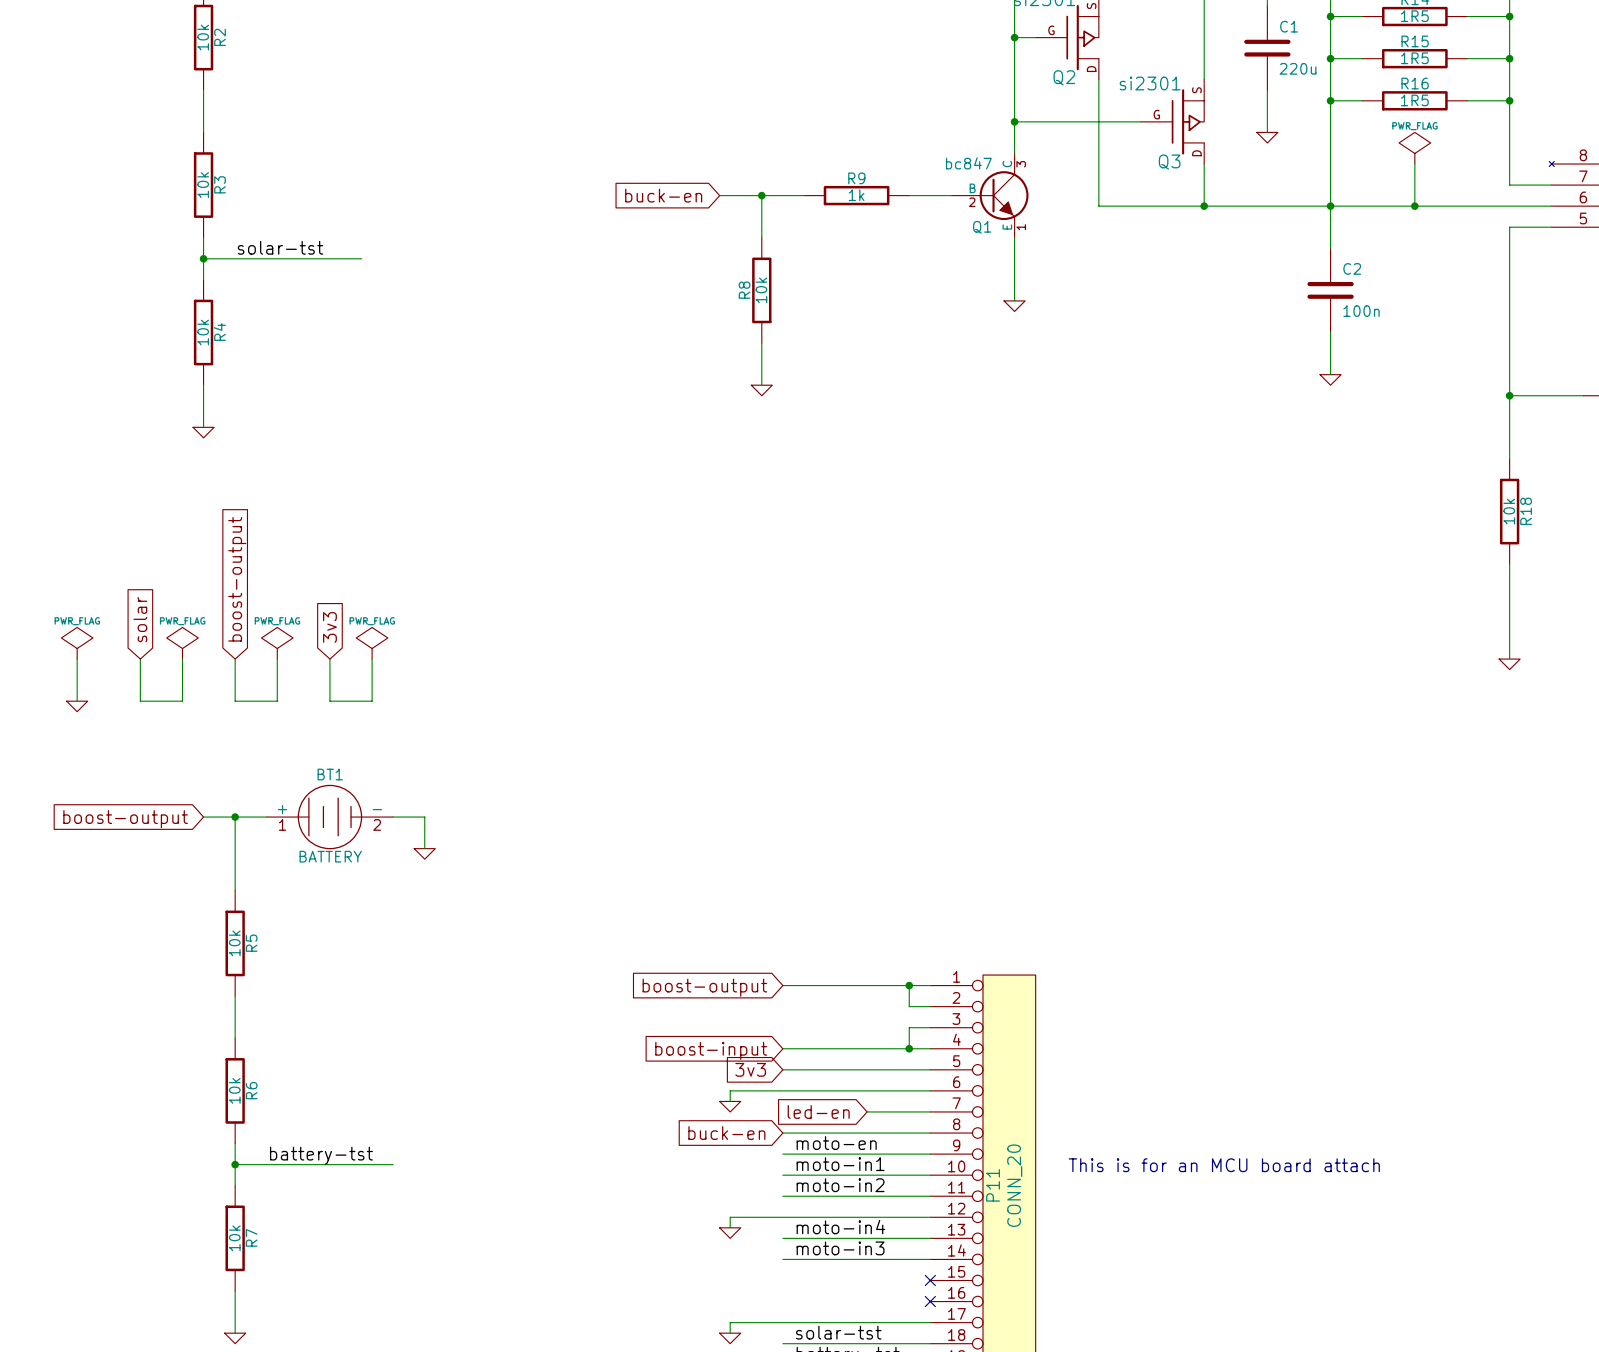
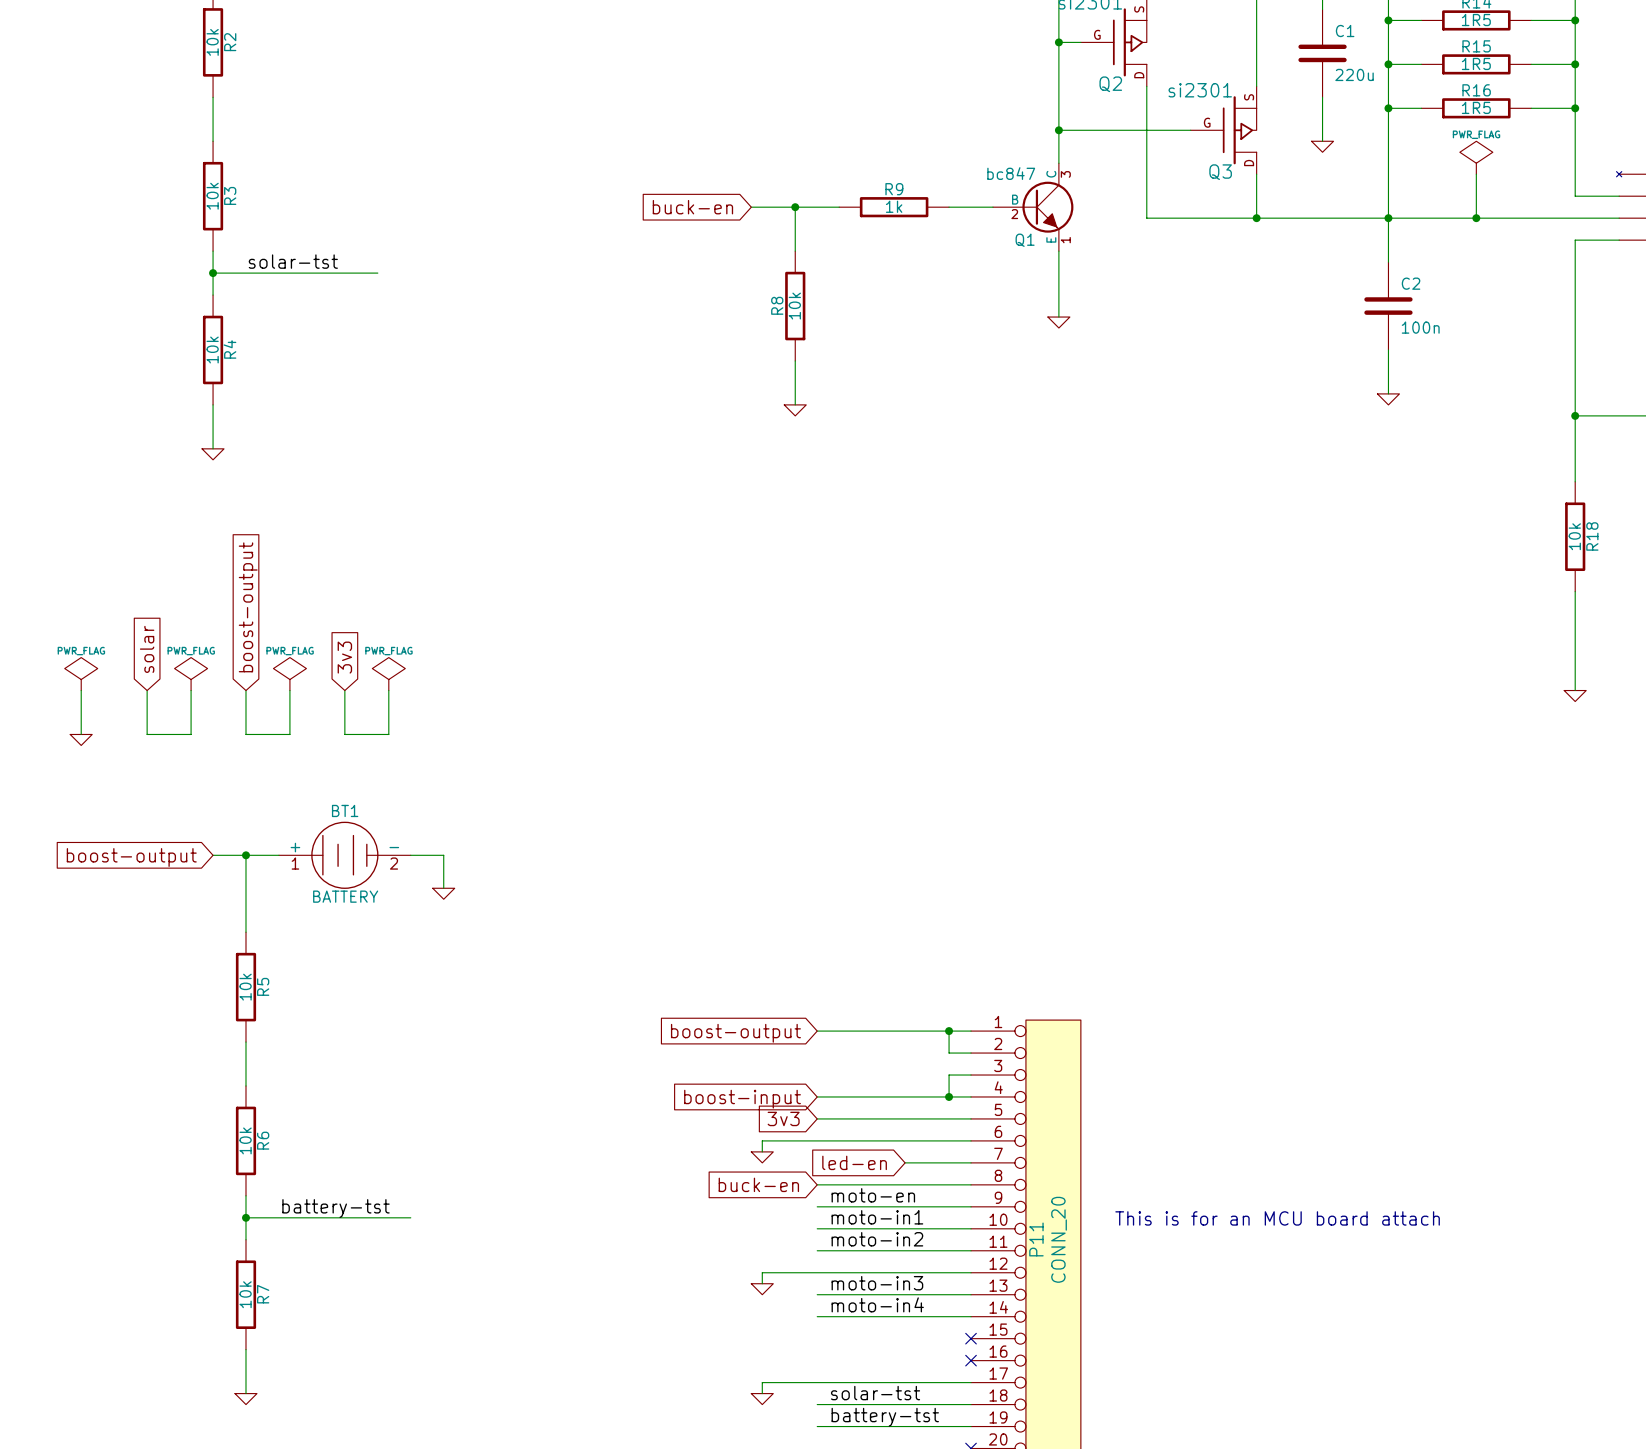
label: moto-in4 (840, 1227) -> moto-in3 (877, 1283)
label: moto-in3 (840, 1248) -> moto-in4 (877, 1304)

